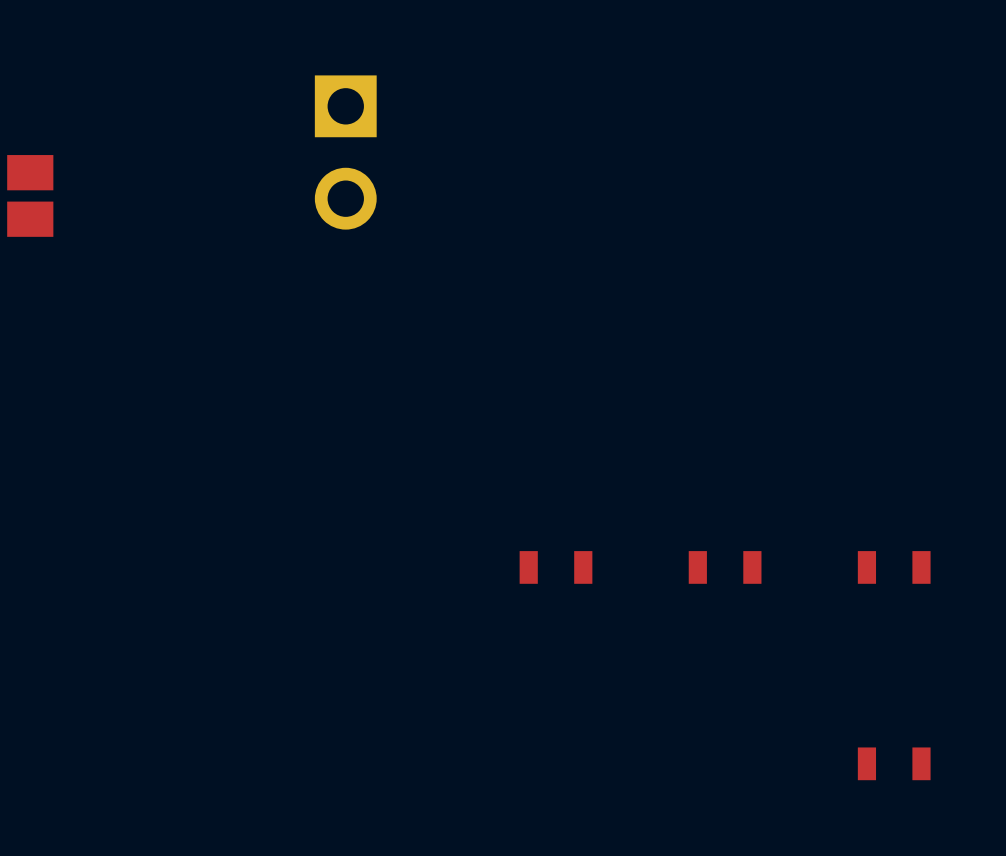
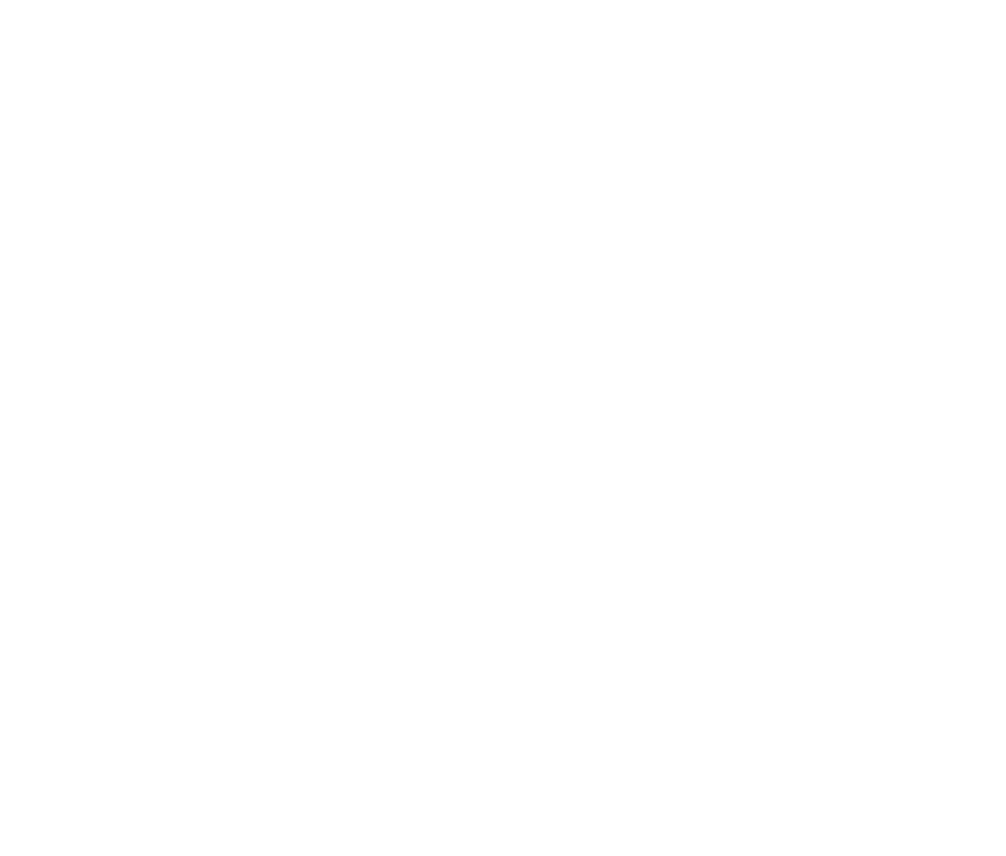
part: (345, 152) -> none
part: (30, 195) -> none
part: (556, 567) -> none
part: (725, 567) -> none
part: (894, 567) -> none
part: (894, 763) -> none

